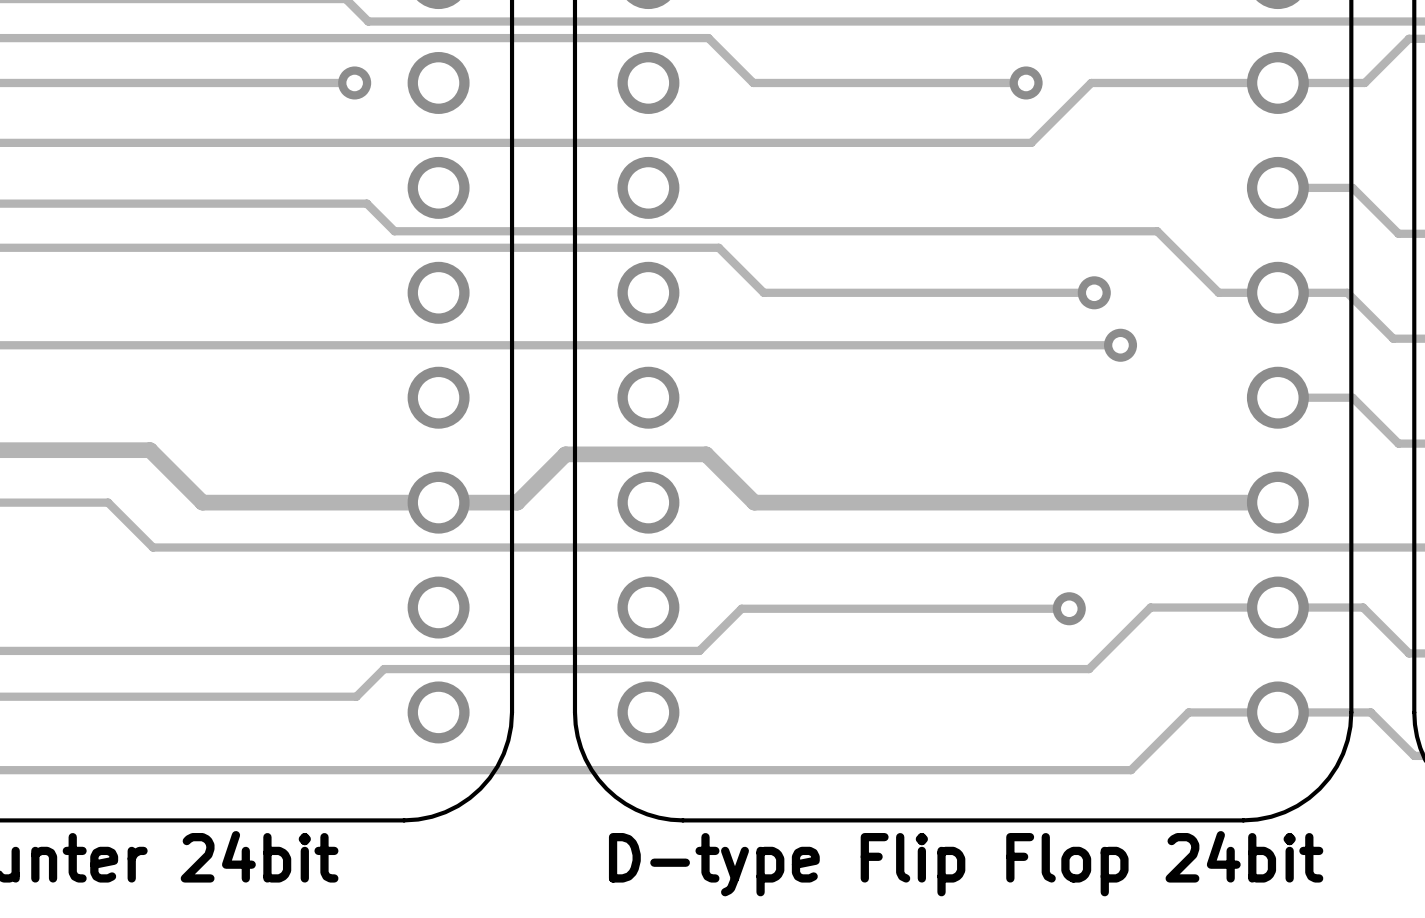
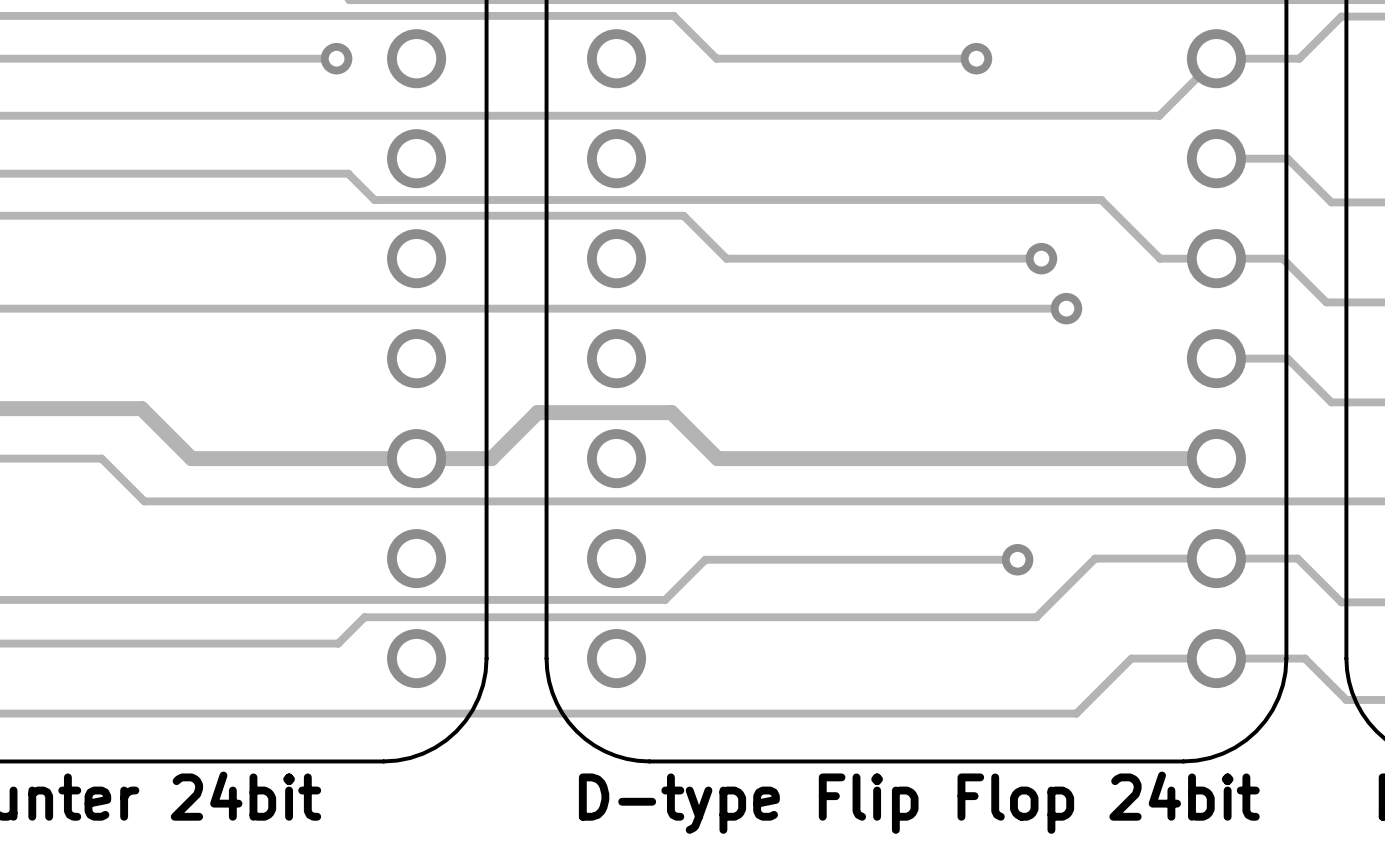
track: (1277, 82) (1091, 82) (1031, 142) -> (1216, 58) (1159, 115) (981, 115)

